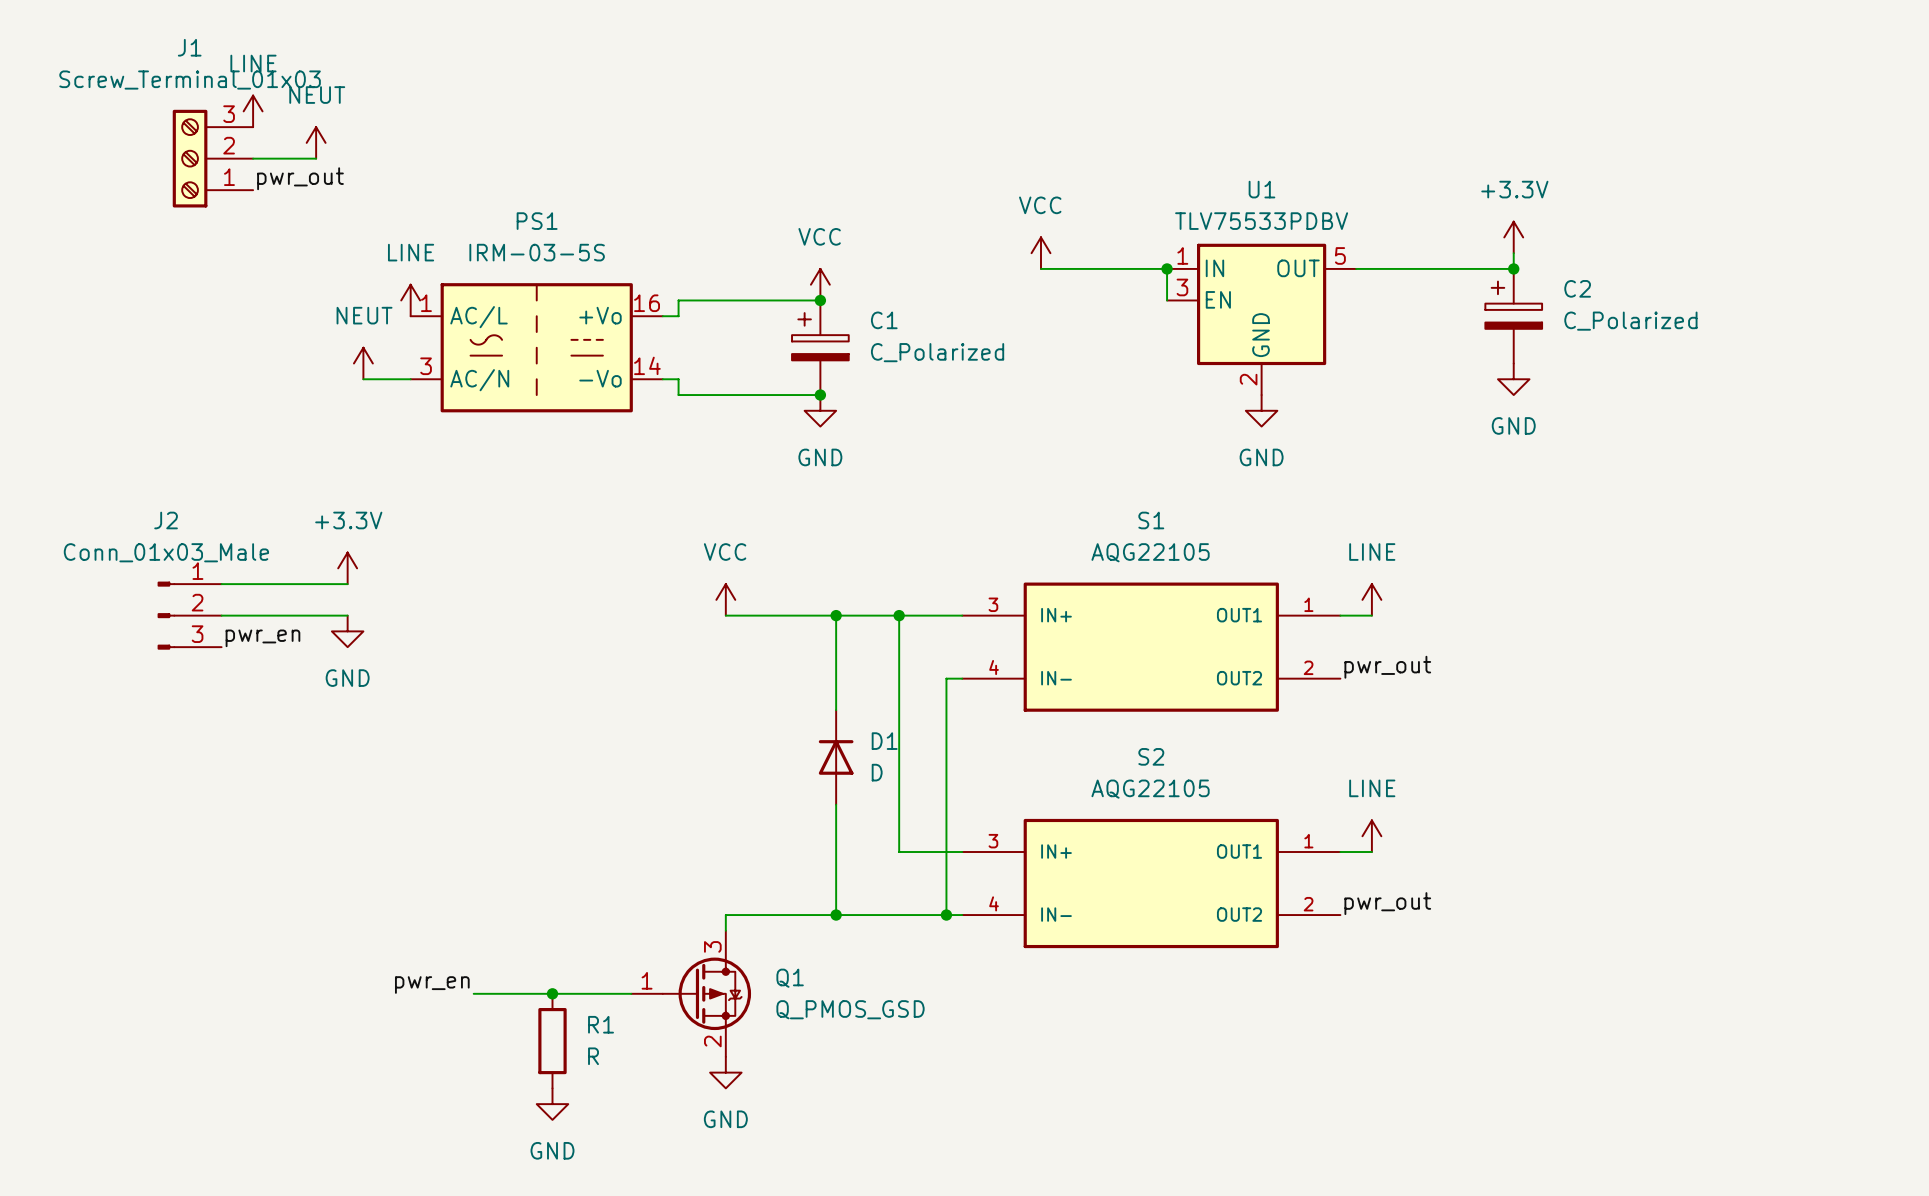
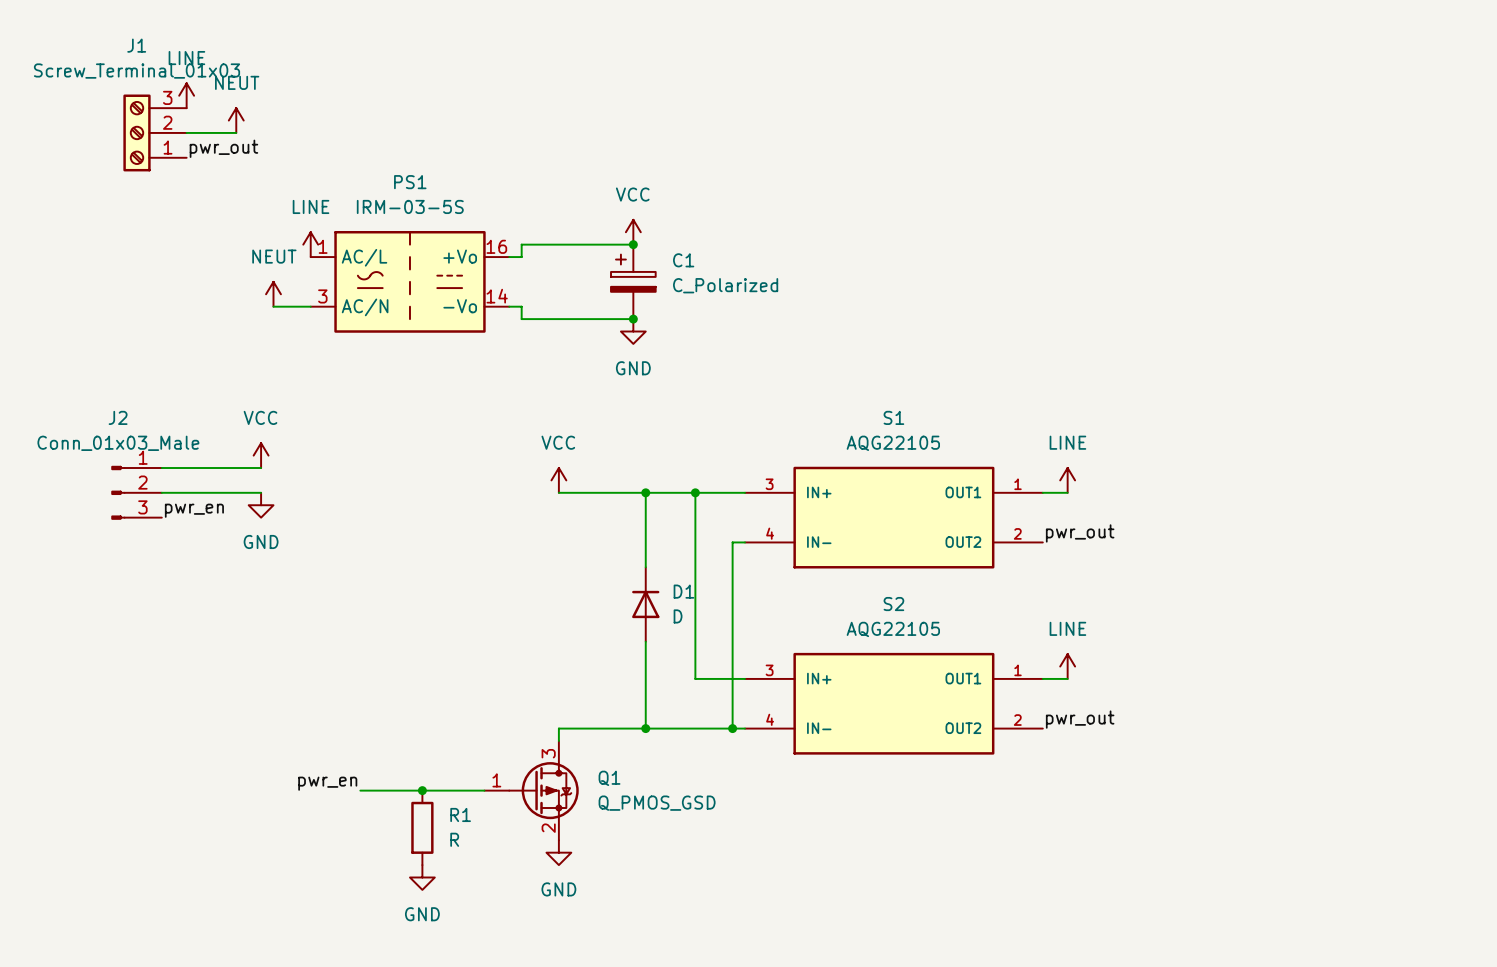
power symbol: +3.3V (1513, 237) -> none
power symbol: VCC (1040, 253) -> none
wire: (1513, 253) (1513, 268) (1356, 268) -> none
wire: (1040, 268) (1167, 268) (1167, 300) -> none
junction: (1167, 268) -> none
junction: (1513, 268) -> none
C2: C_Polarized (1513, 316) -> none
U1: TLV75533PDBV (1261, 319) -> none
power symbol: GND (1513, 379) -> none
power symbol: GND (1261, 410) -> none
power symbol: +3.3V (347, 568) -> VCC (261, 455)

